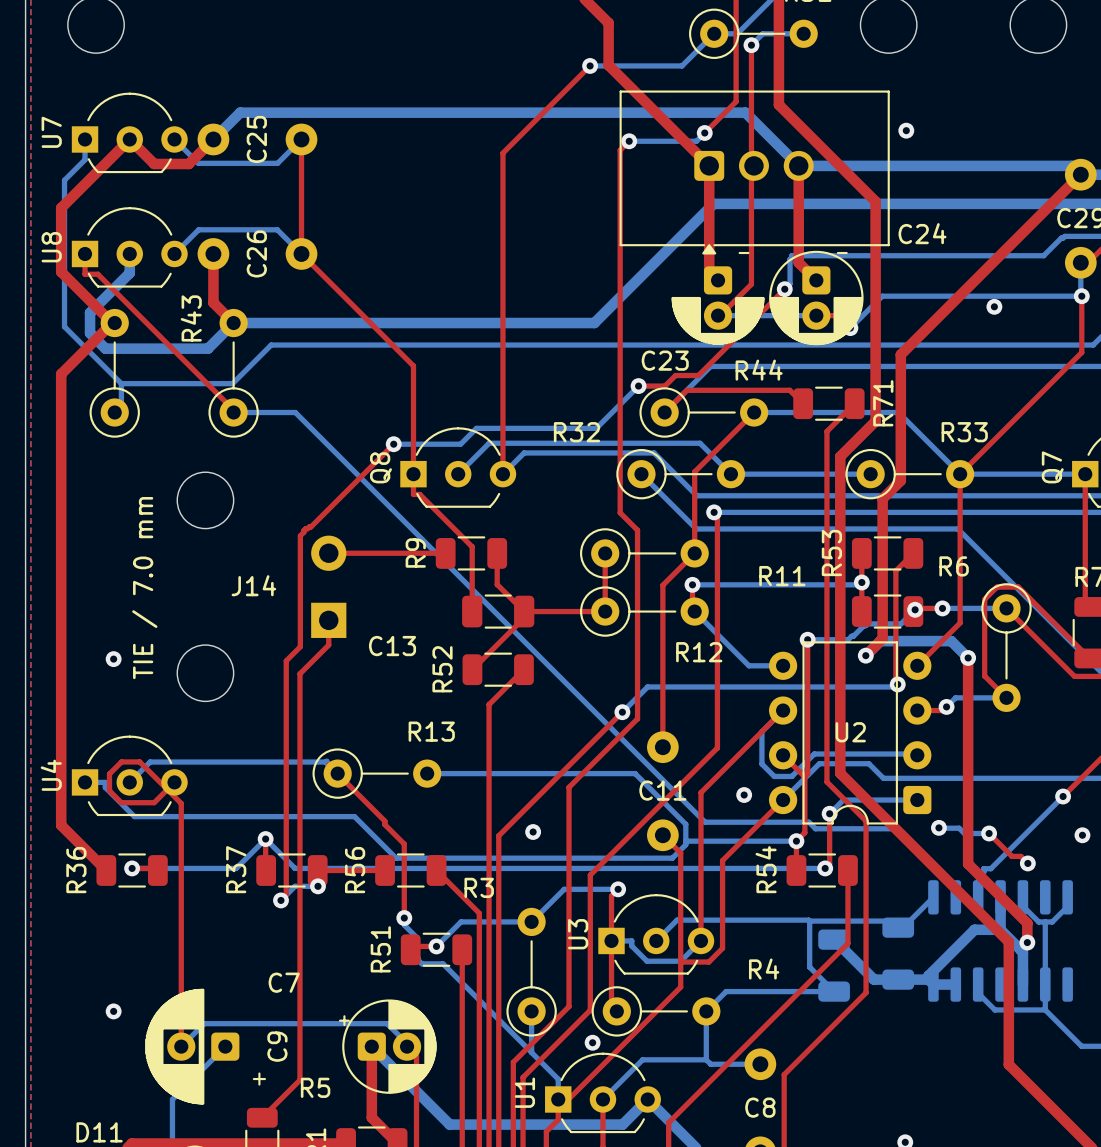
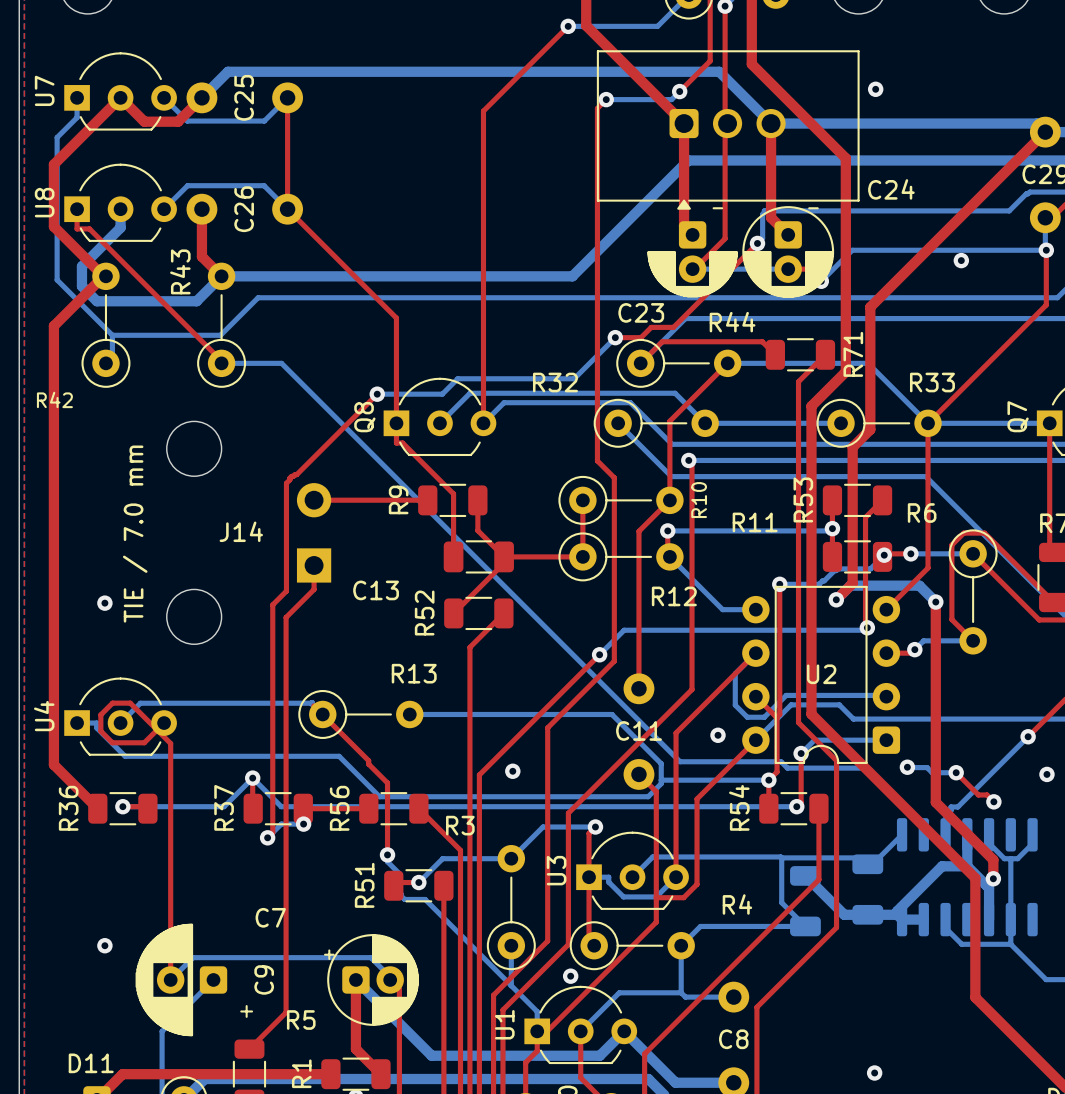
R42 name: none -> R42 (54, 399)
R10 name: none -> R10 (699, 500)

